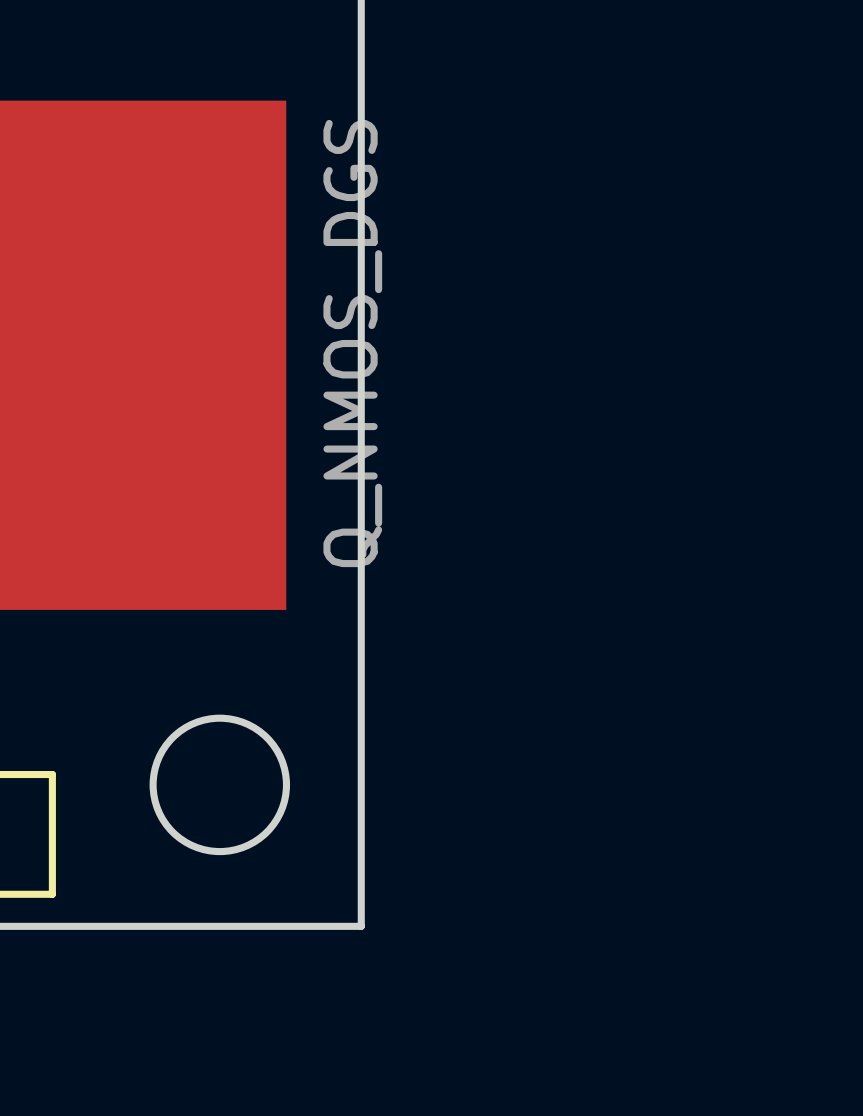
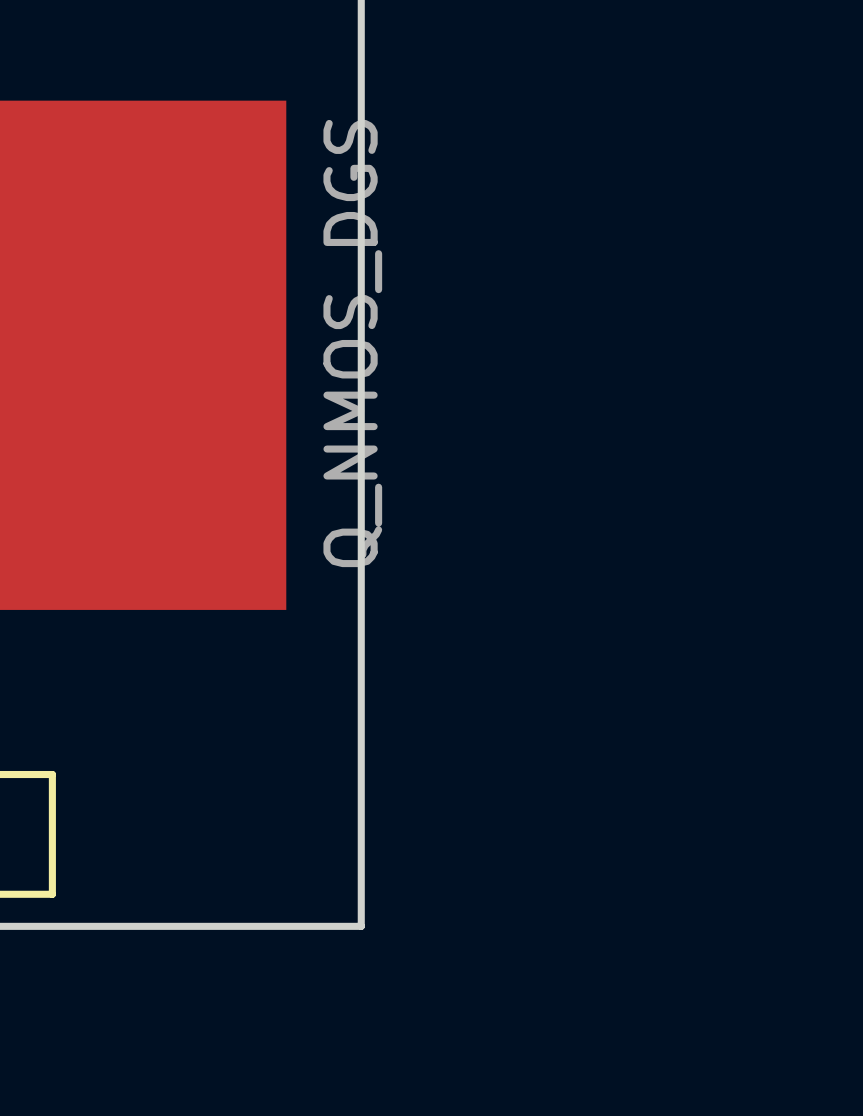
round board edge: [149, 714, 291, 856] -> none

